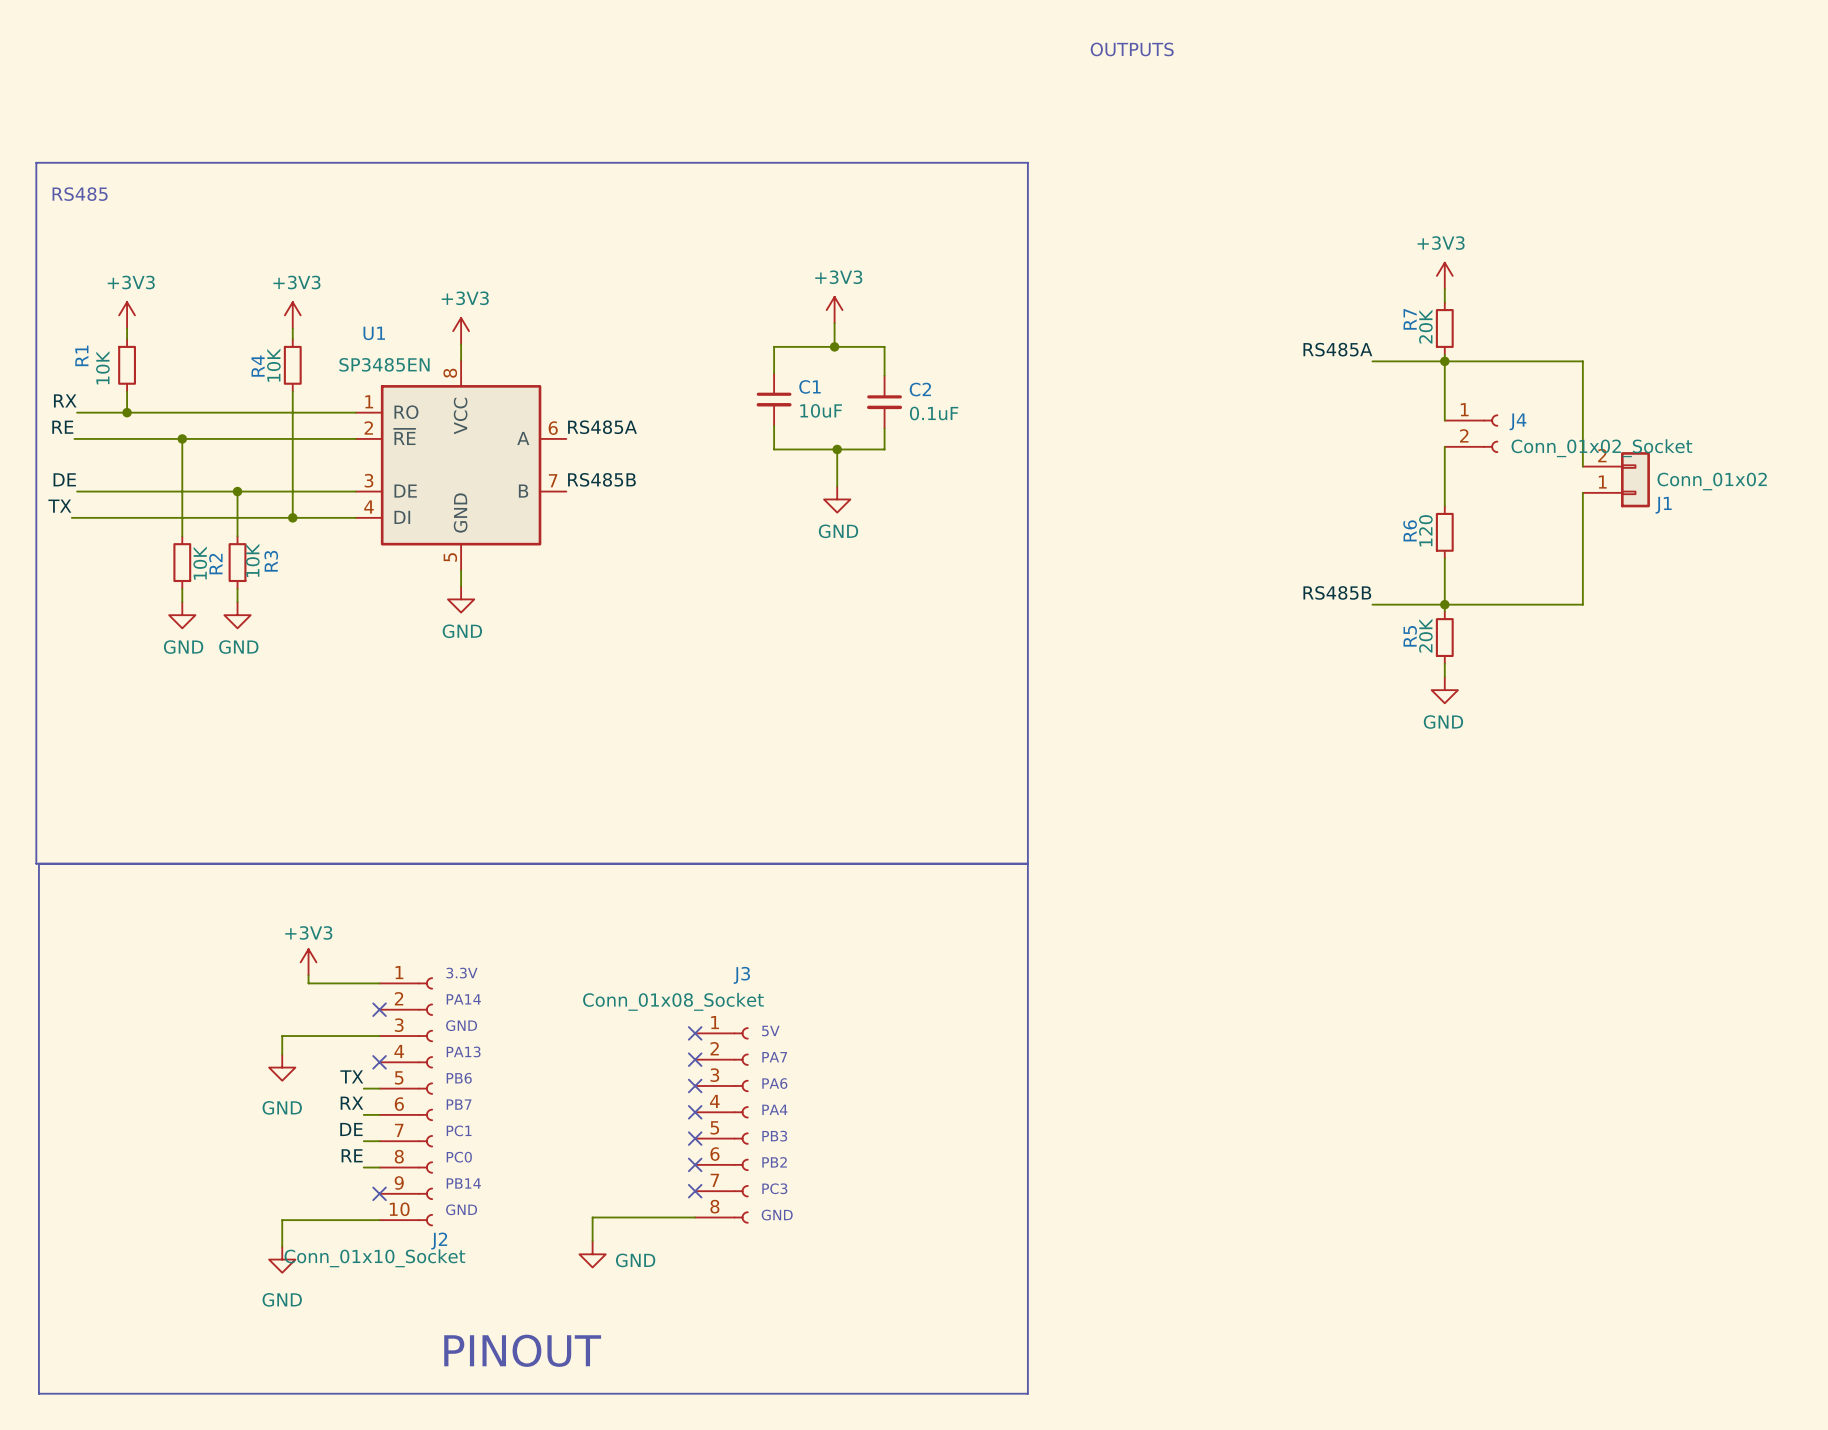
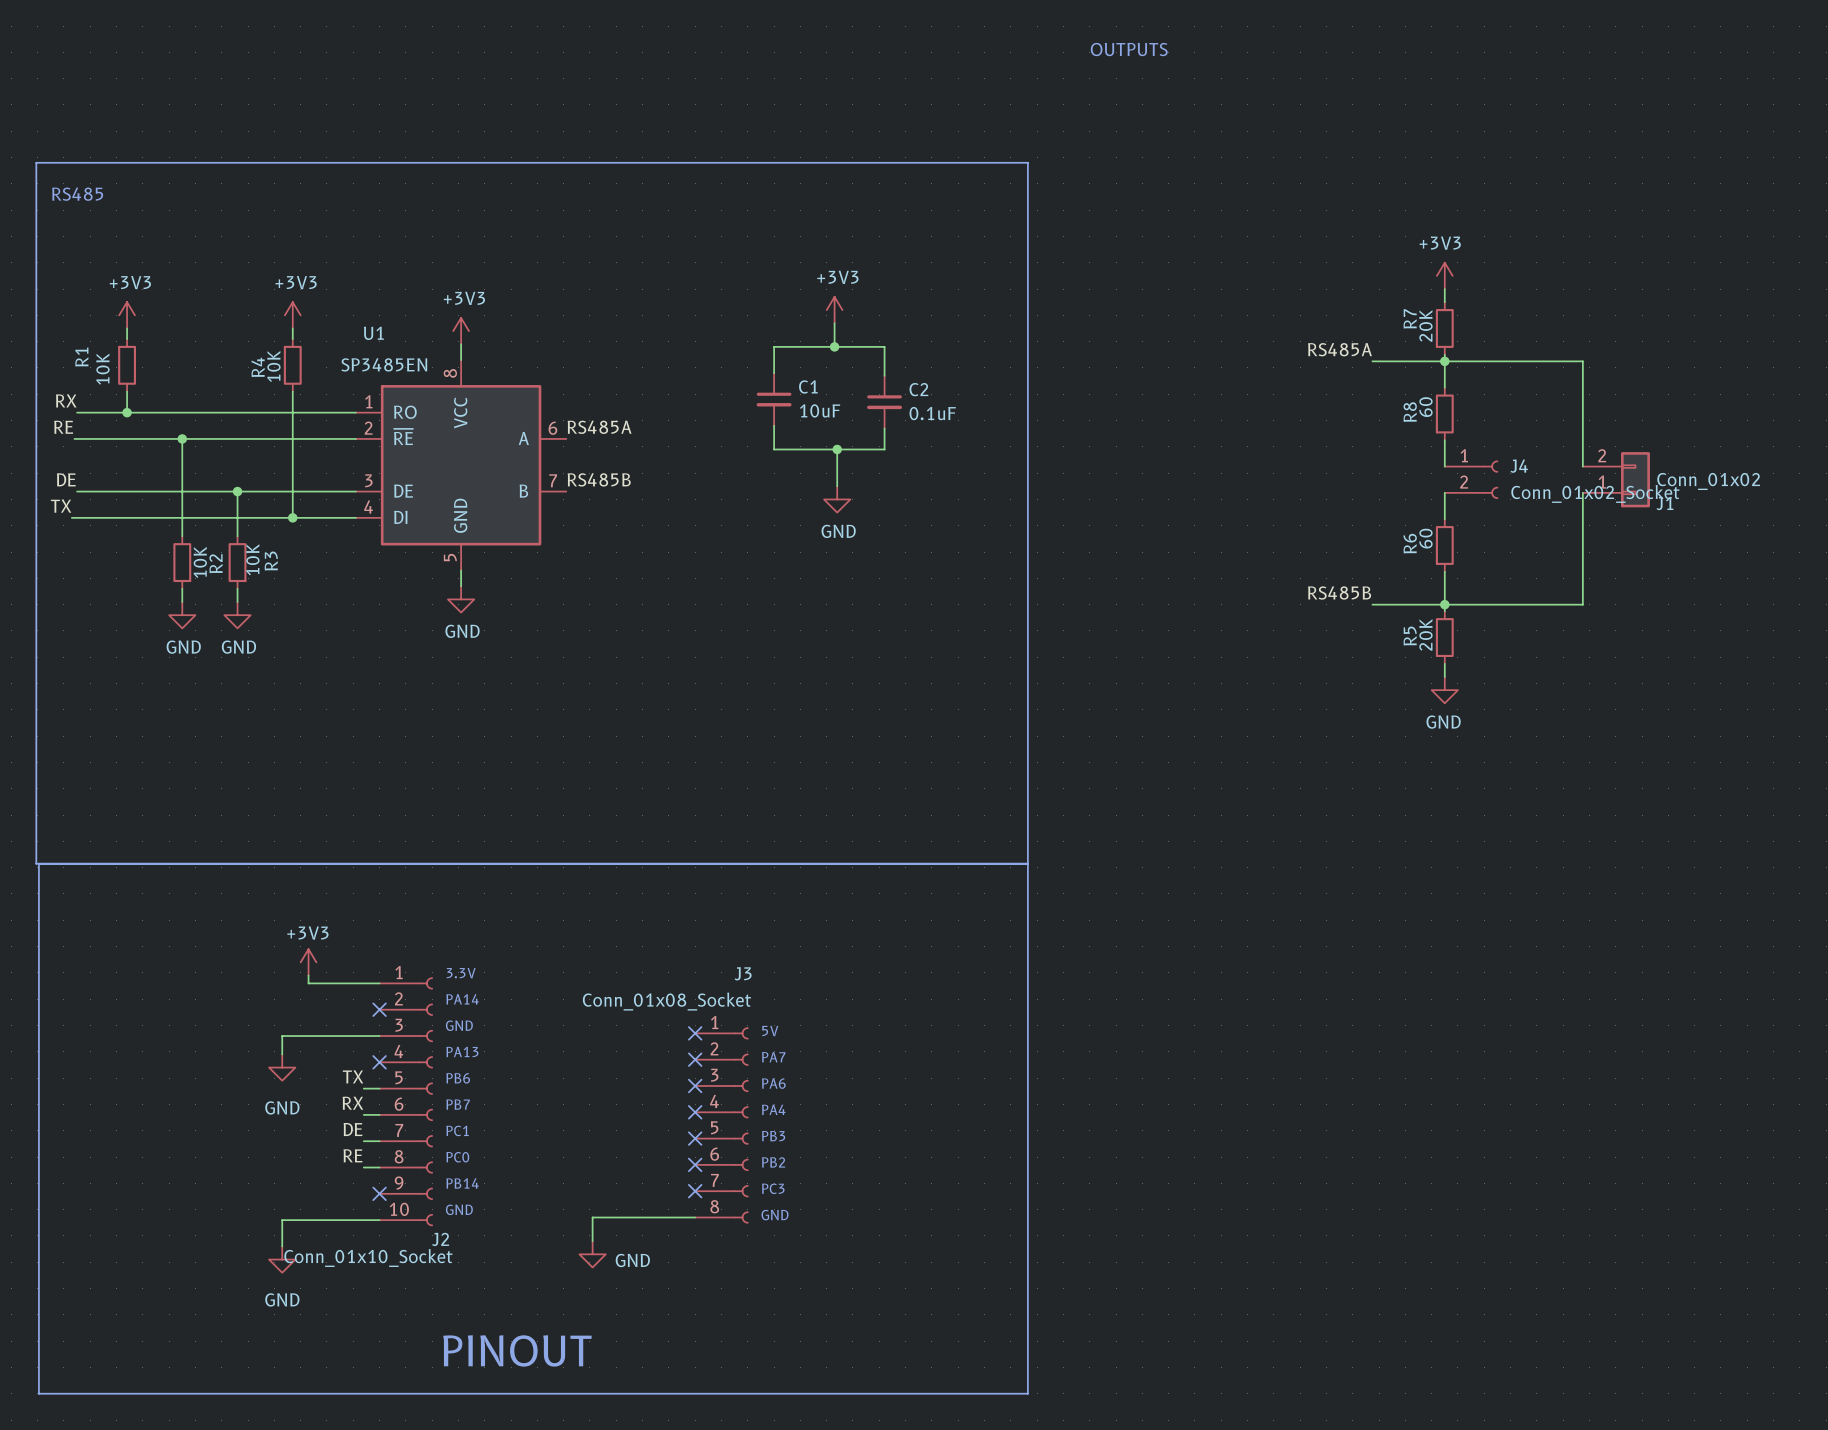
wire: (1444, 387) (1444, 420) -> none
R8: none -> 60 (1444, 413)
J4 position: (1471, 433) -> (1471, 479)
wire: none -> (1444, 440) (1444, 446)
wire: (1444, 466) (1444, 492) -> none
R6 value: 120 (1425, 530) -> 60 (1425, 538)
R6 position: (1444, 532) -> (1444, 545)

